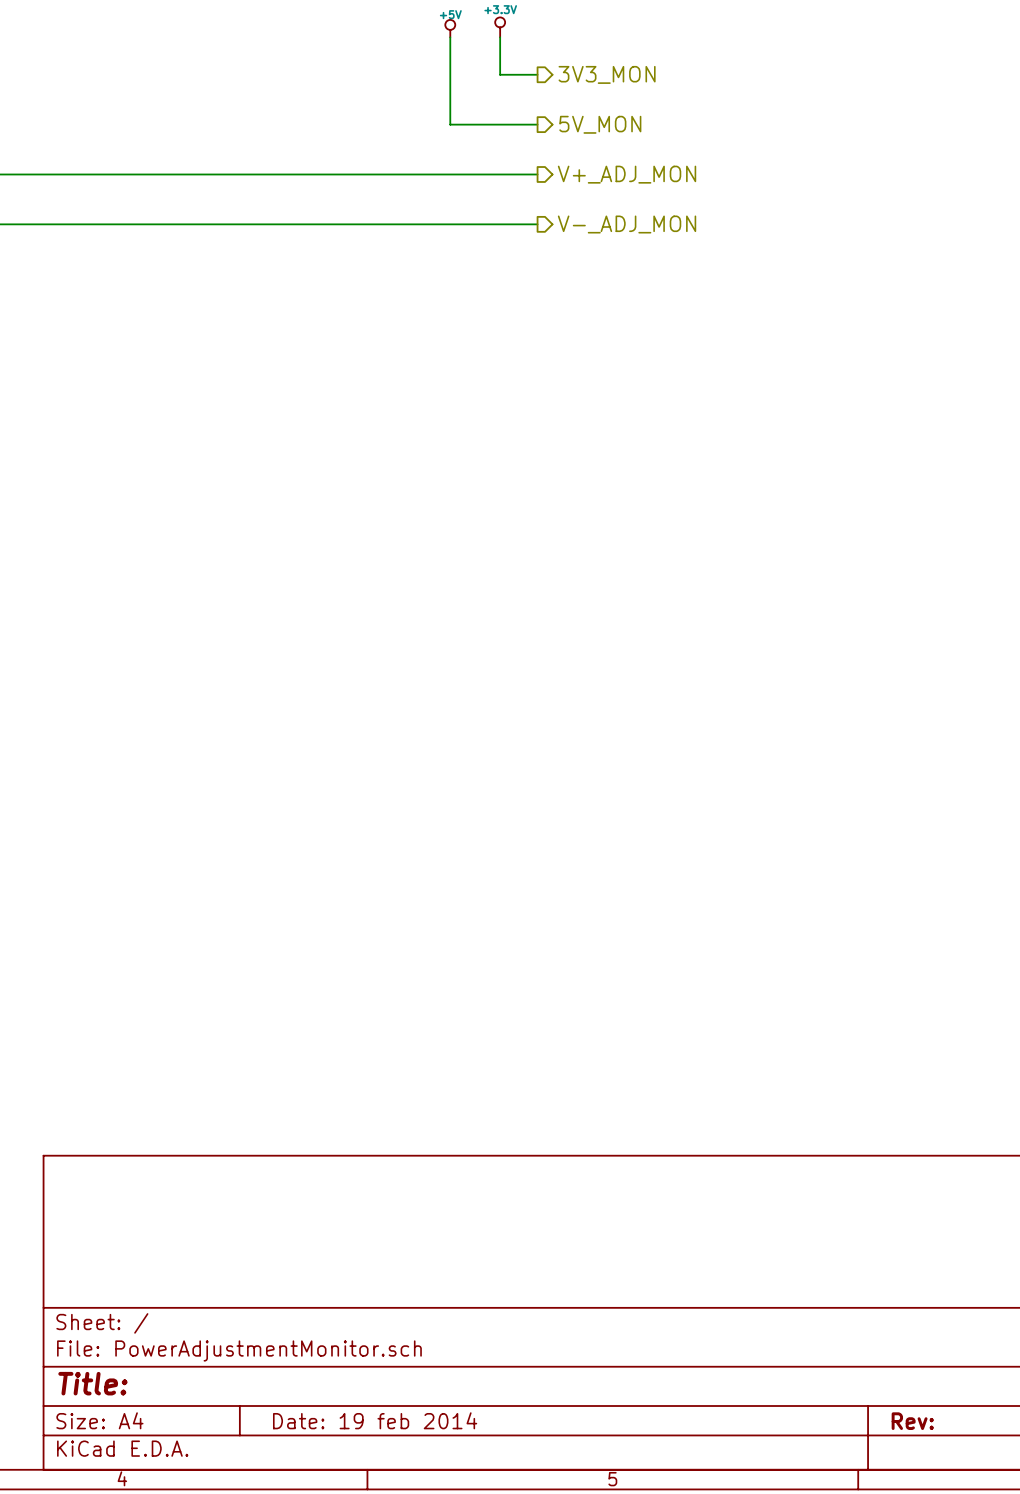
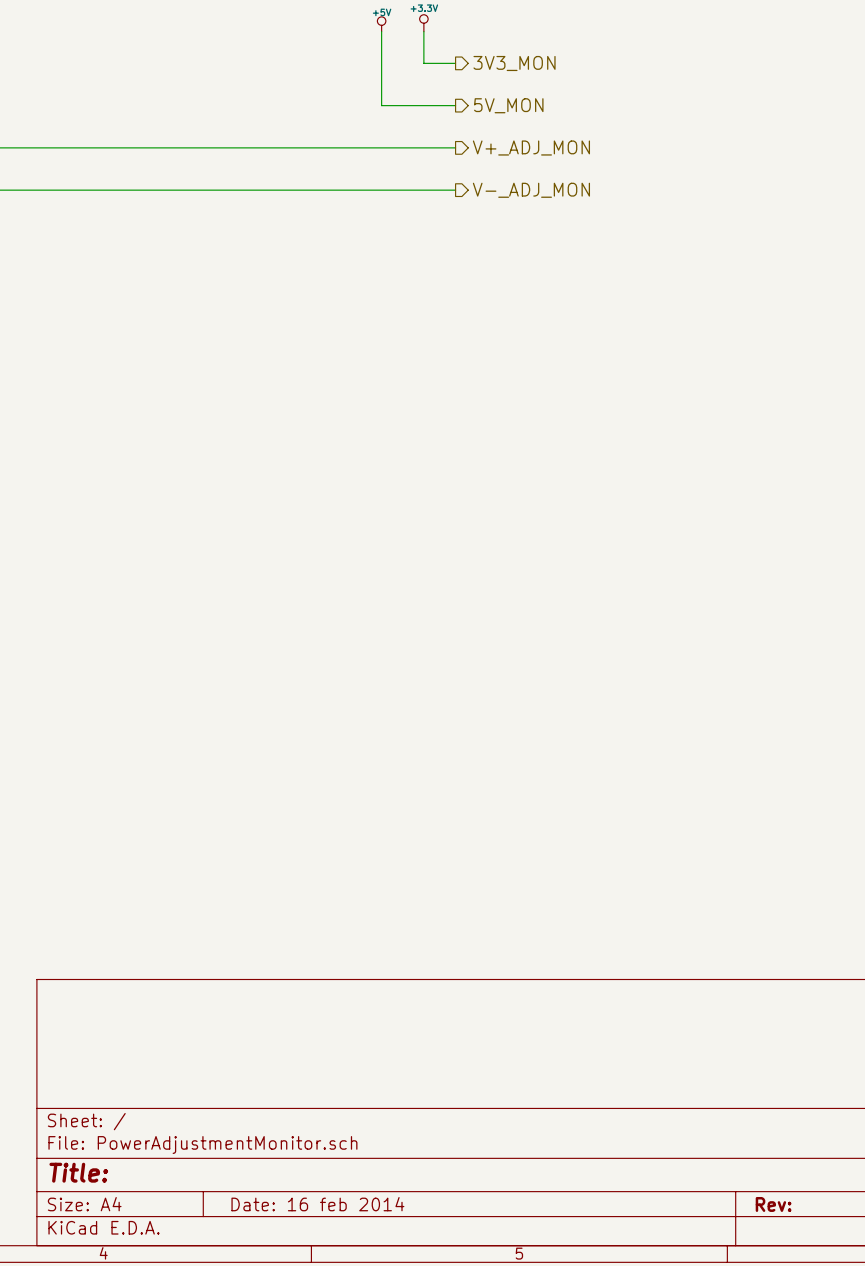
title block: Date: 19 feb 2014 (375, 1420) -> Date: 16 feb 2014 (317, 1204)

